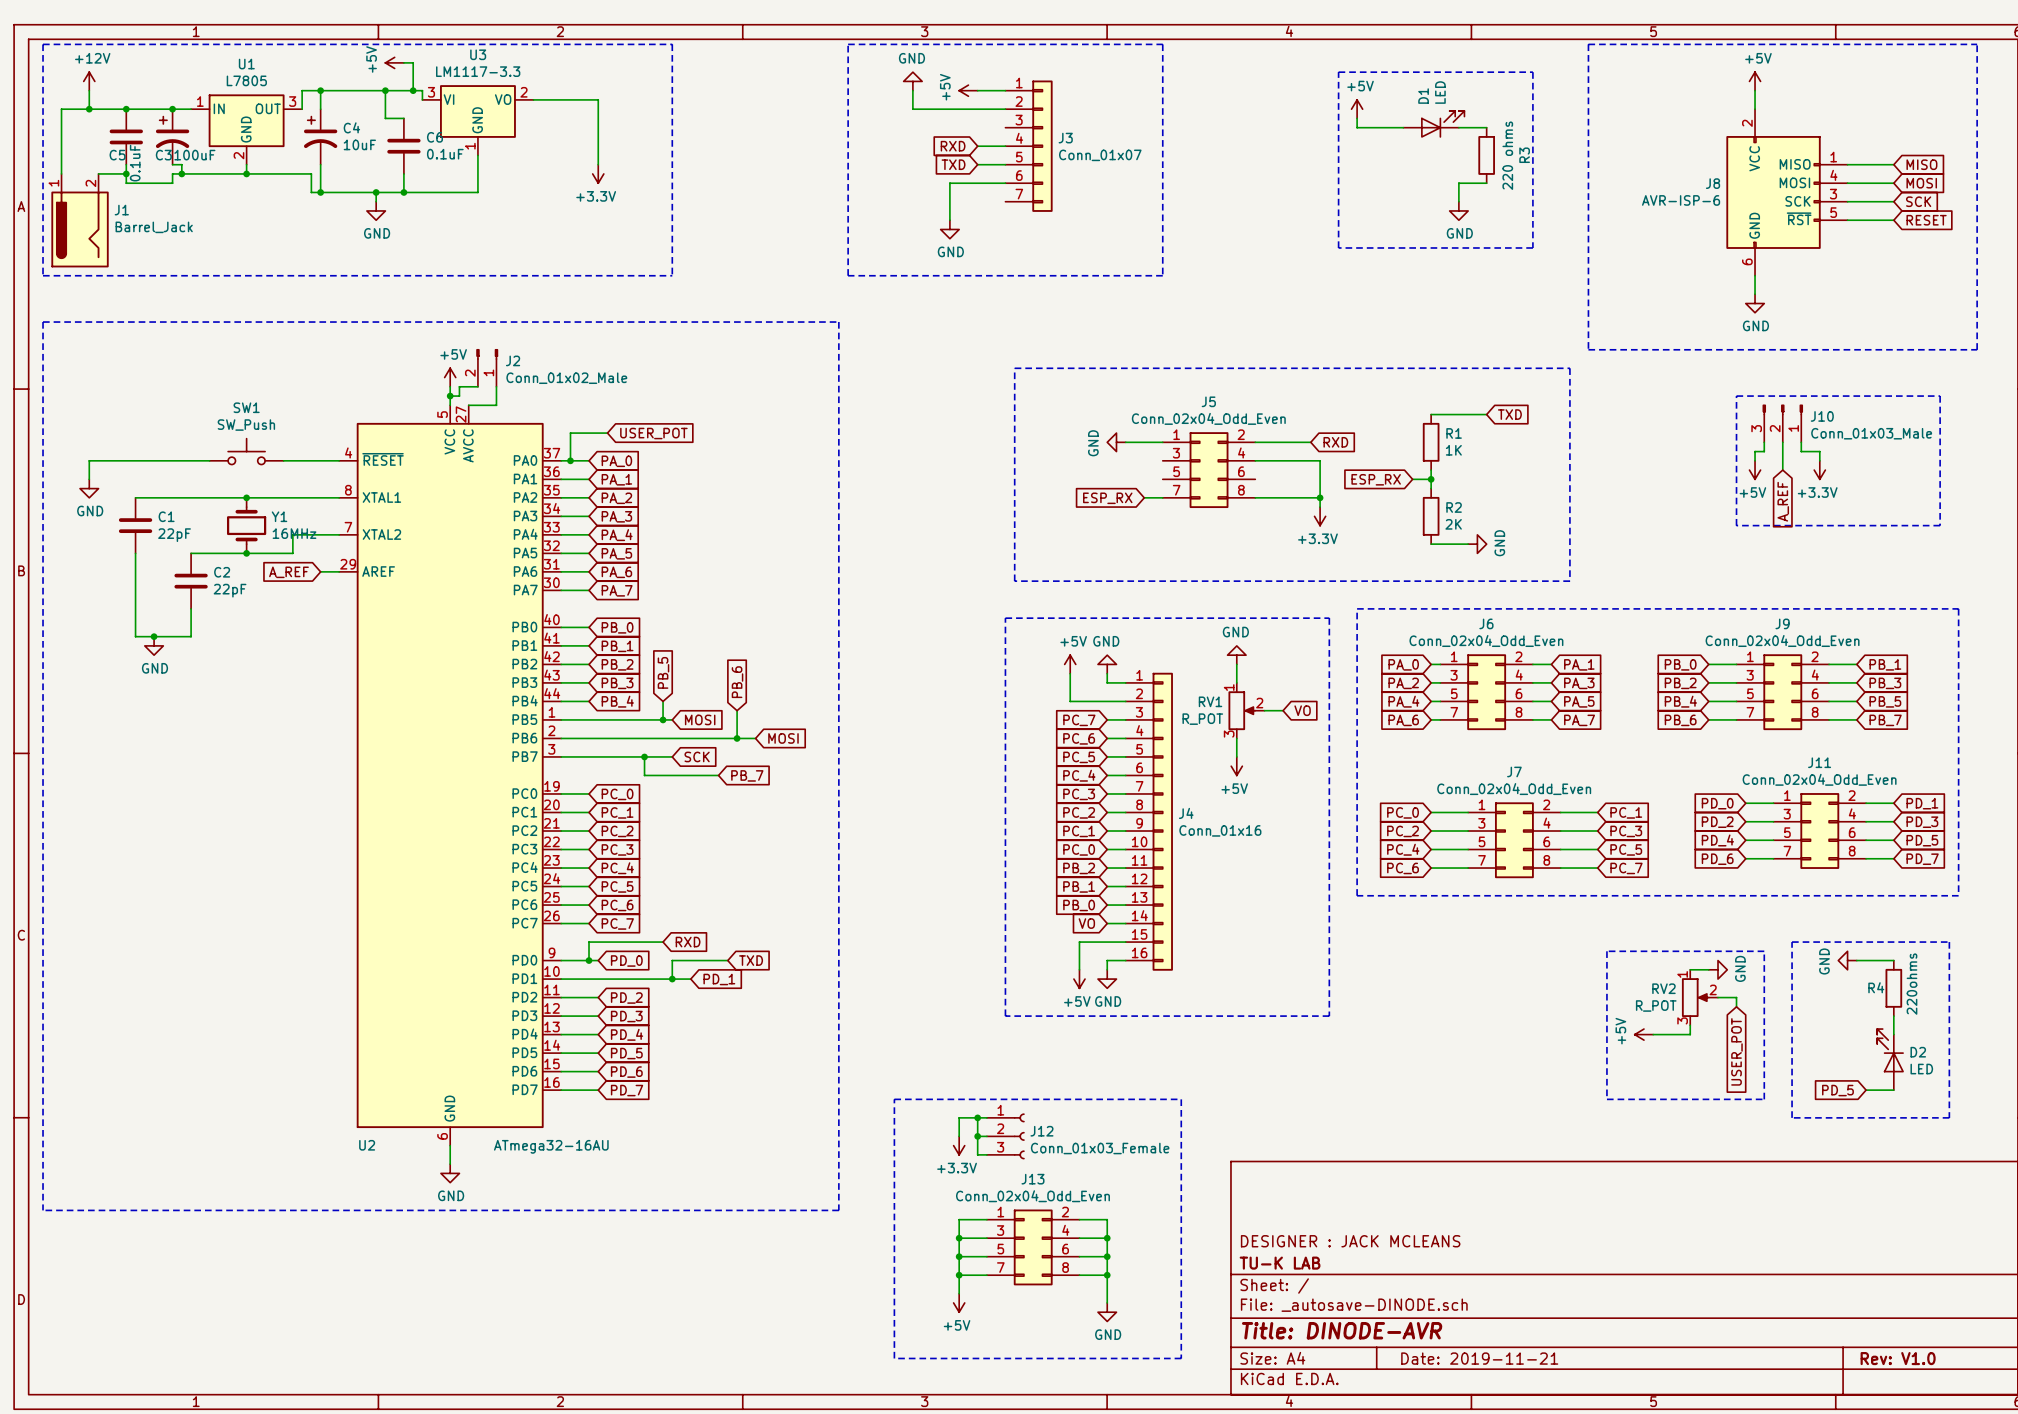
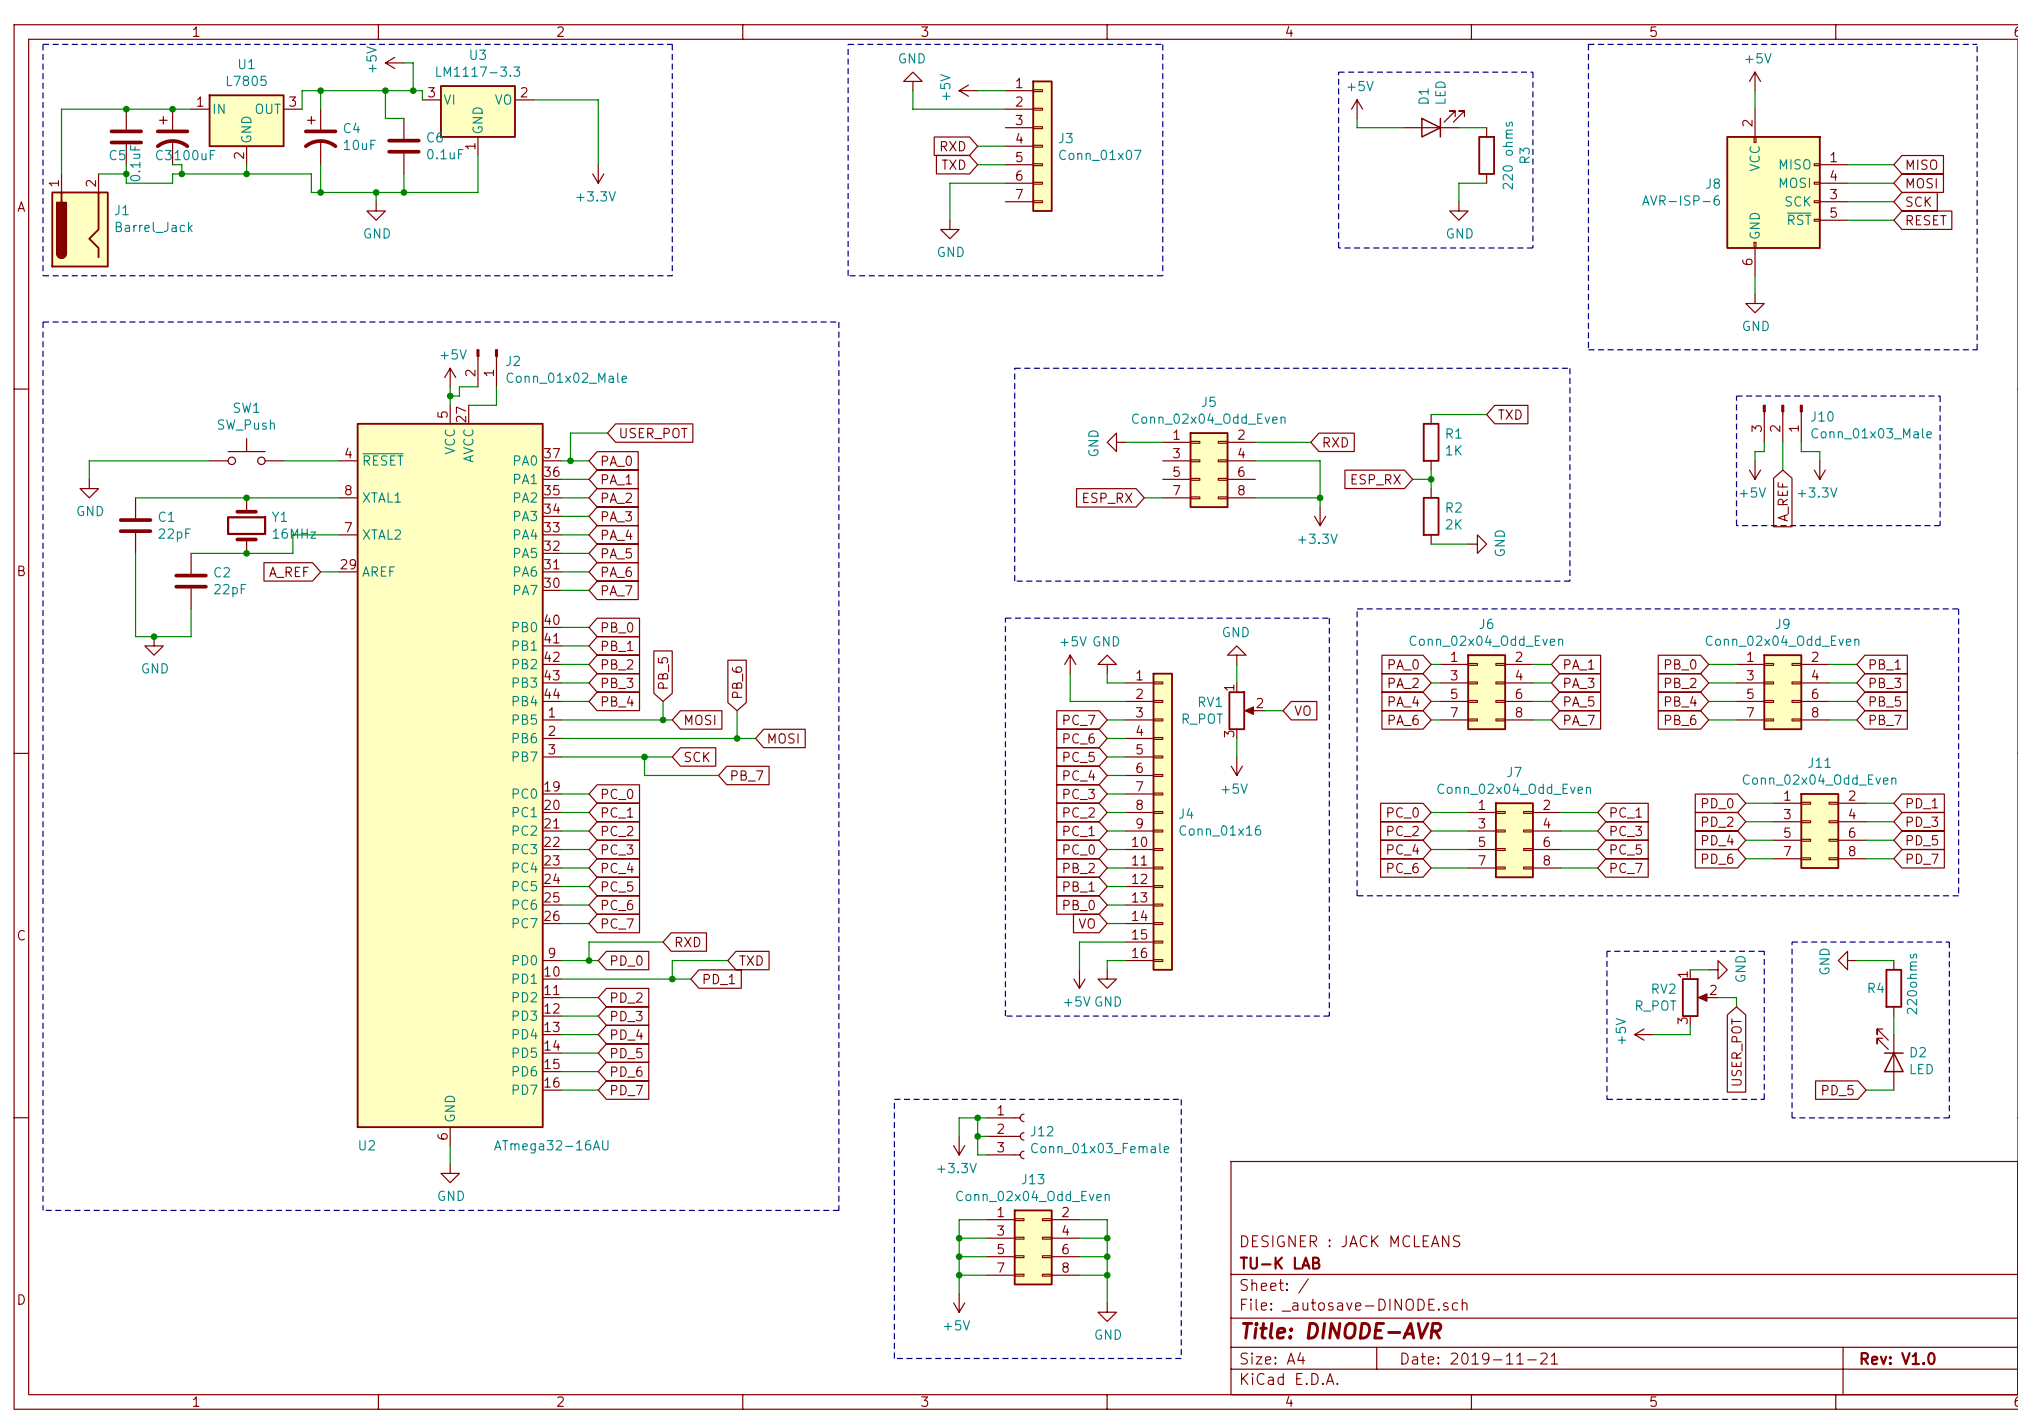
power symbol: +12V (89, 81) -> none
wire: (89, 90) (89, 109) -> none
junction: (89, 109) -> none

